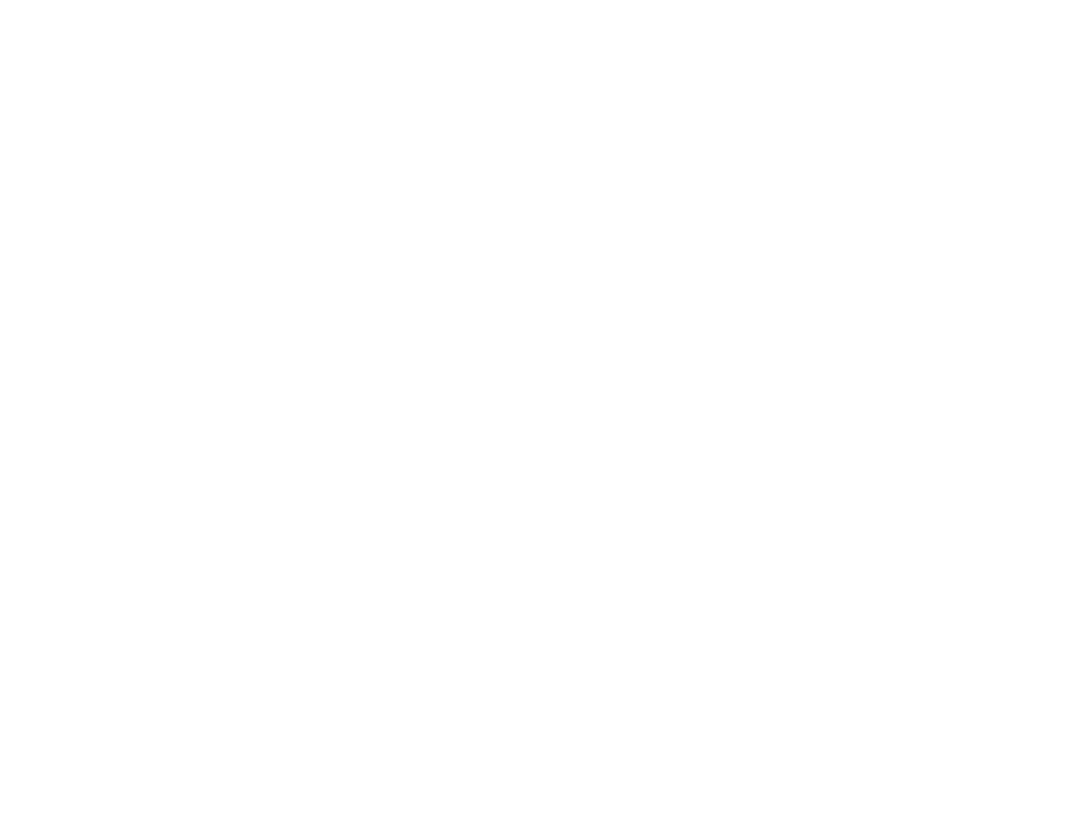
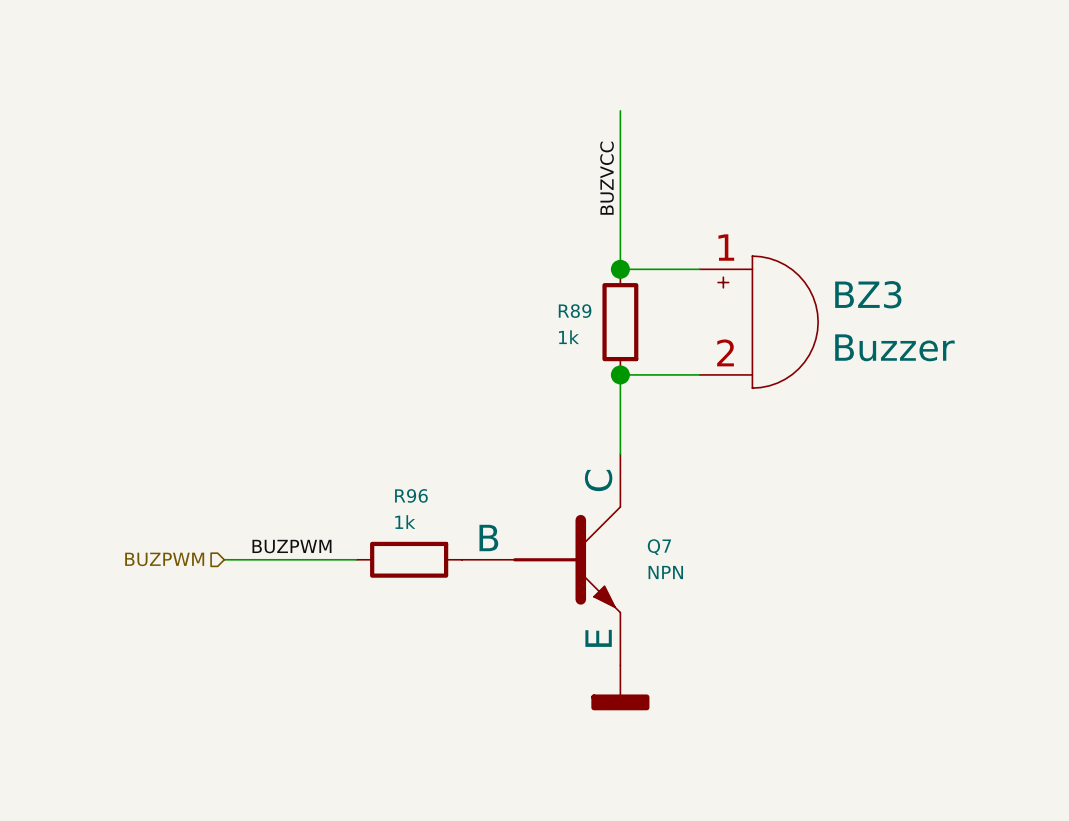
wire: none -> (620, 110) (620, 269) (699, 269)
label: none -> BUZVCC (607, 178)
junction: none -> (620, 269)
R89: none -> 1k (620, 322)
BZ3: none -> Buzzer (758, 322)
junction: none -> (620, 374)
wire: none -> (699, 374) (620, 374) (620, 454)
label: none -> BUZPWM (291, 546)
hierarchical label: none -> BUZPWM (164, 559)
wire: none -> (224, 559) (356, 559)
R96: none -> 1k (409, 559)
Q7: none -> NPN (544, 559)
power symbol: none -> (620, 687)

